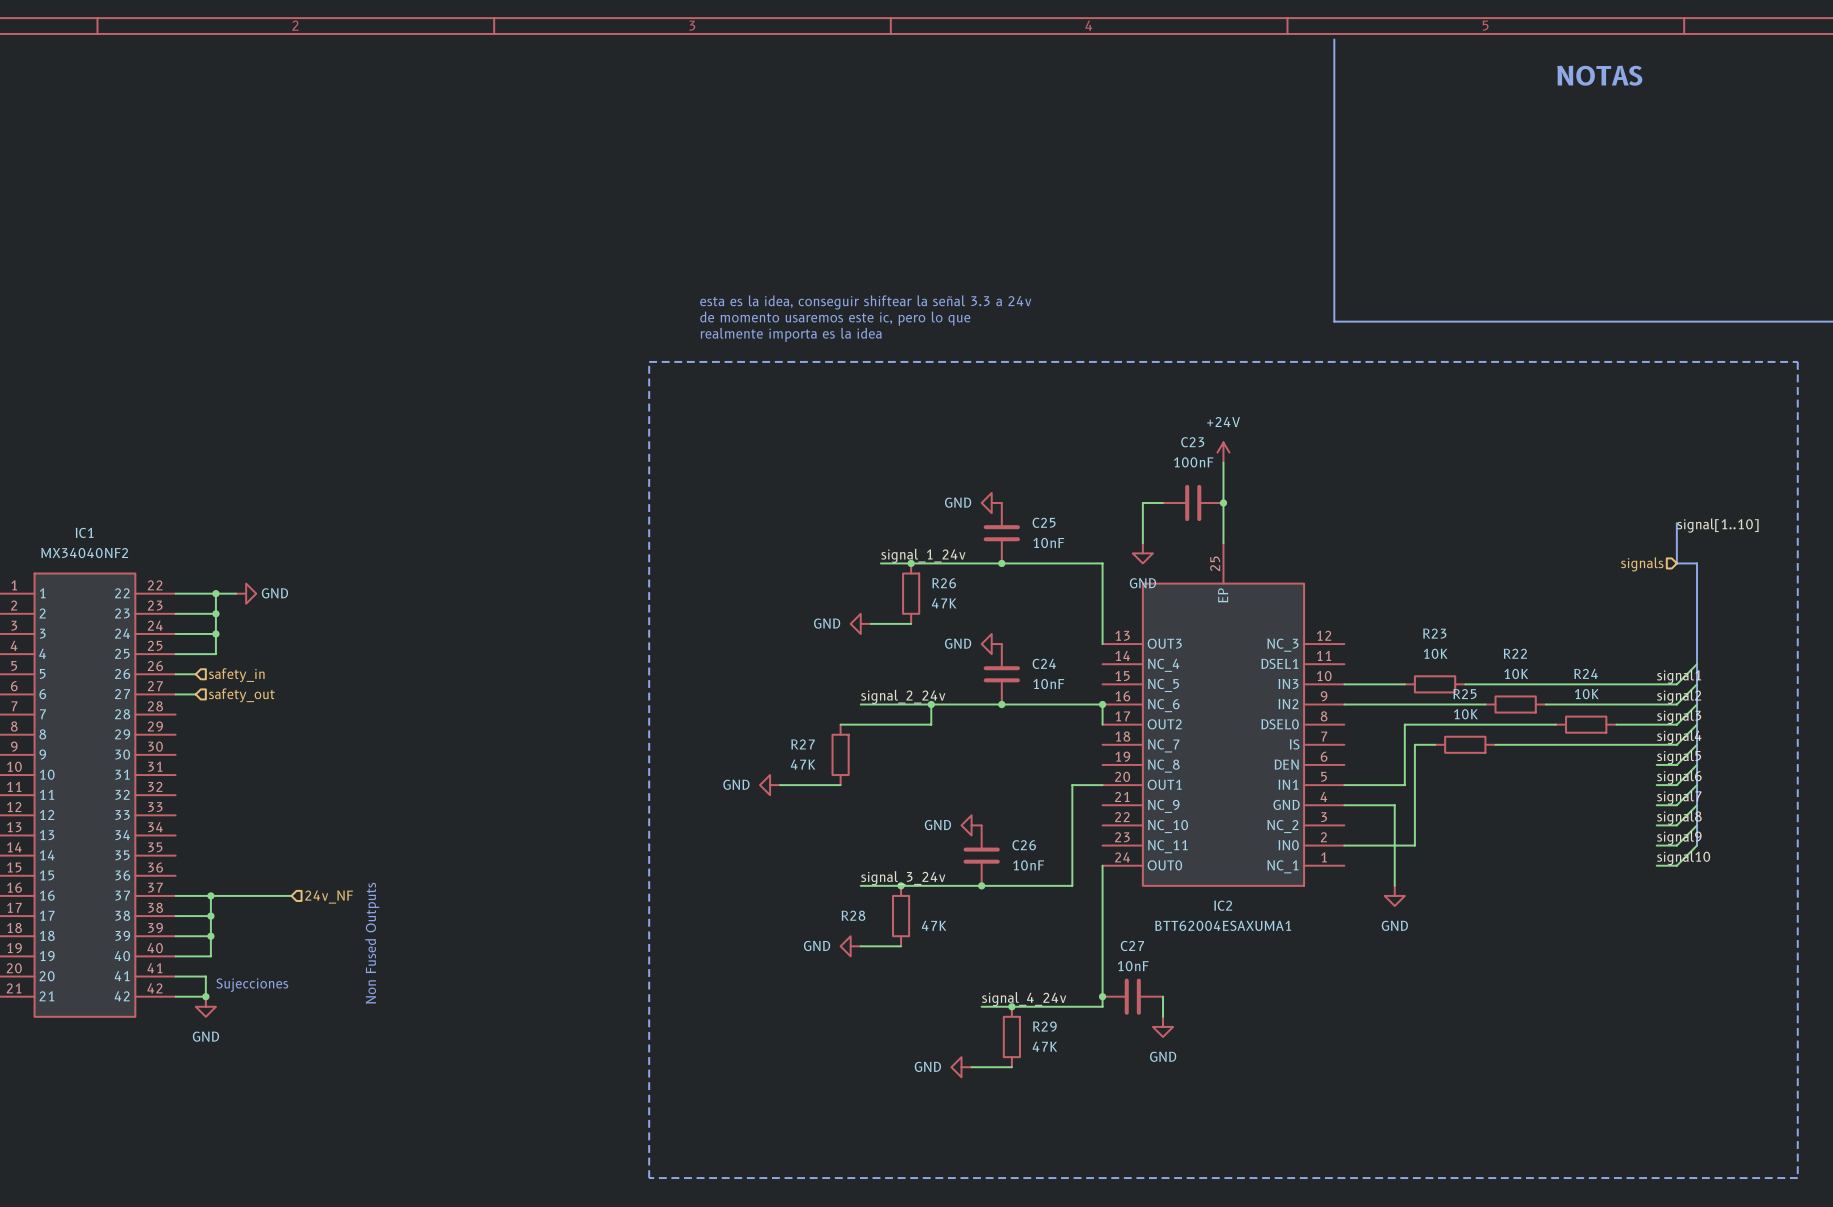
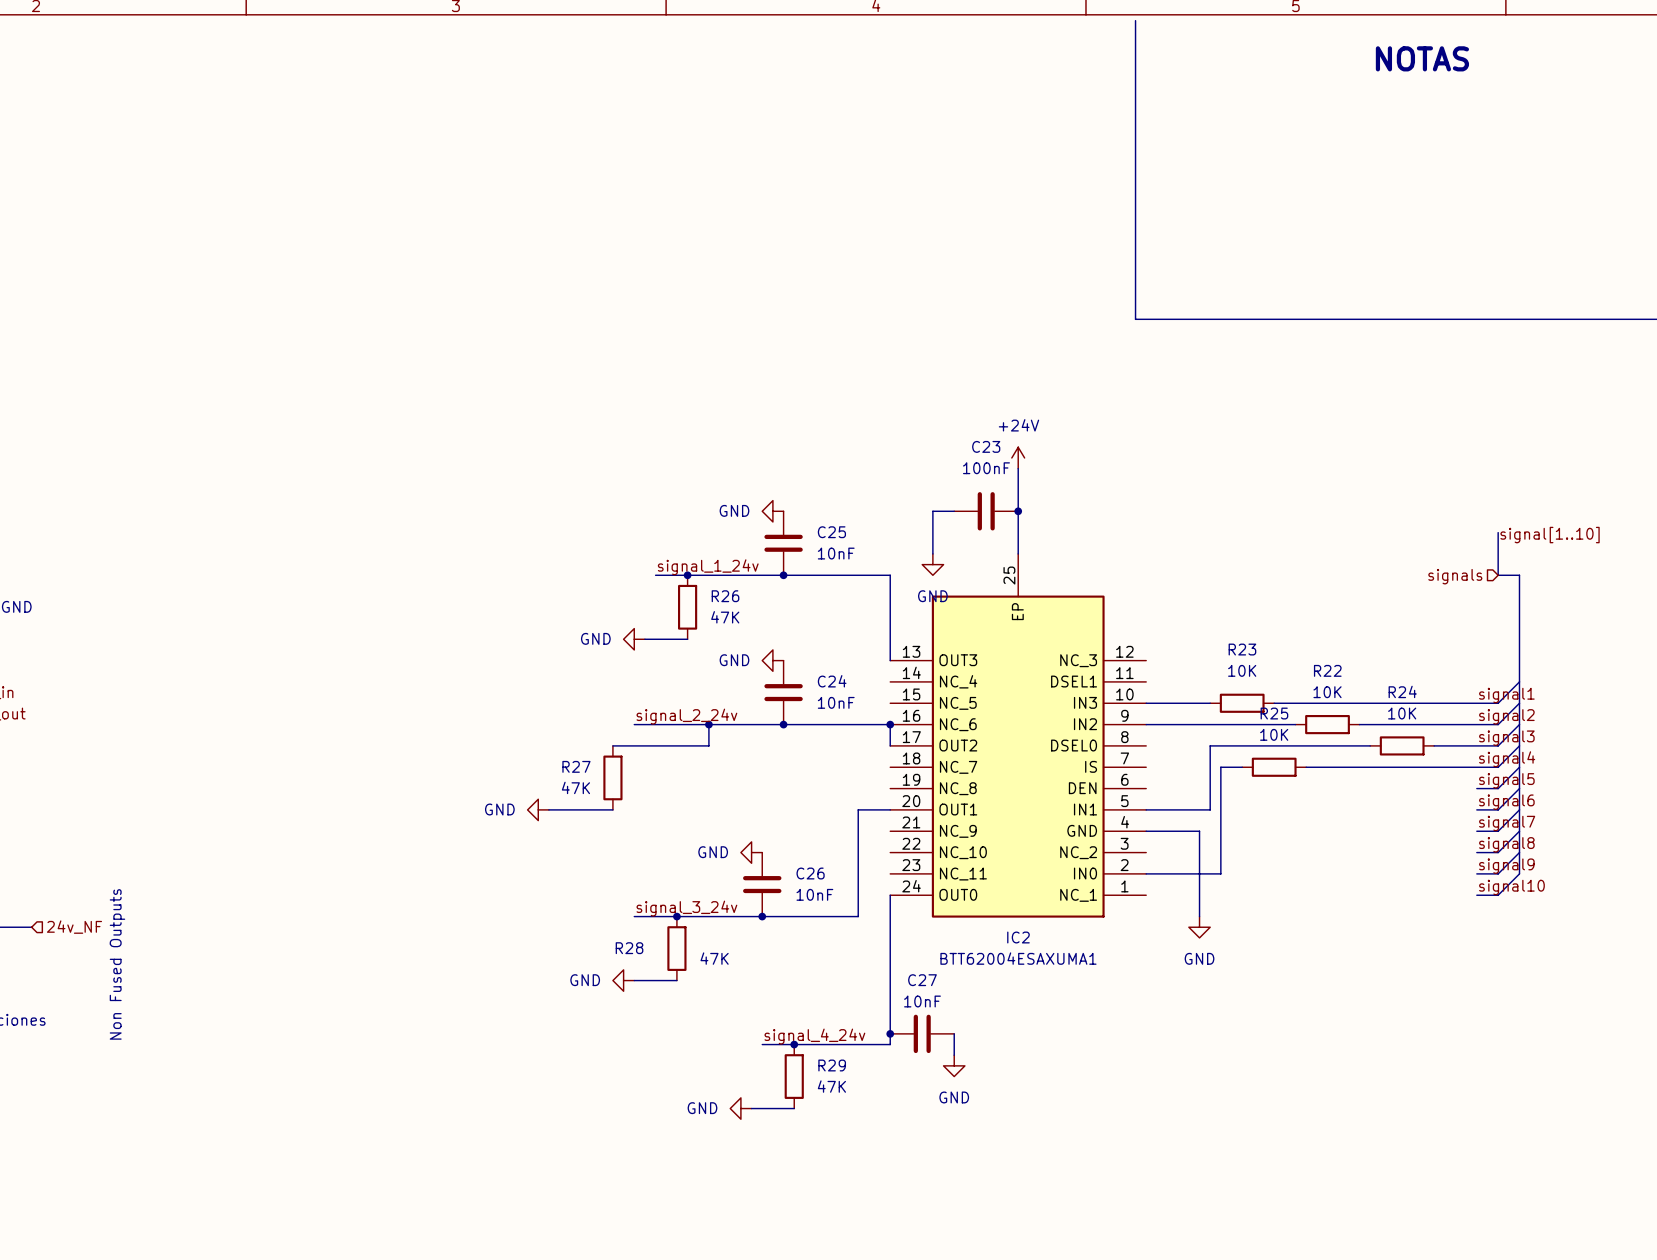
text: esta es la idea, conseguir shiftear la señal 3.3 a 24v (865, 302) -> none
text: de momento usaremos este ic, pero lo que (835, 318) -> none
text: realmente importa es la idea (791, 334) -> none
line: (649, 361) (1797, 361) (1797, 1178) (649, 1178) (649, 361) -> none

